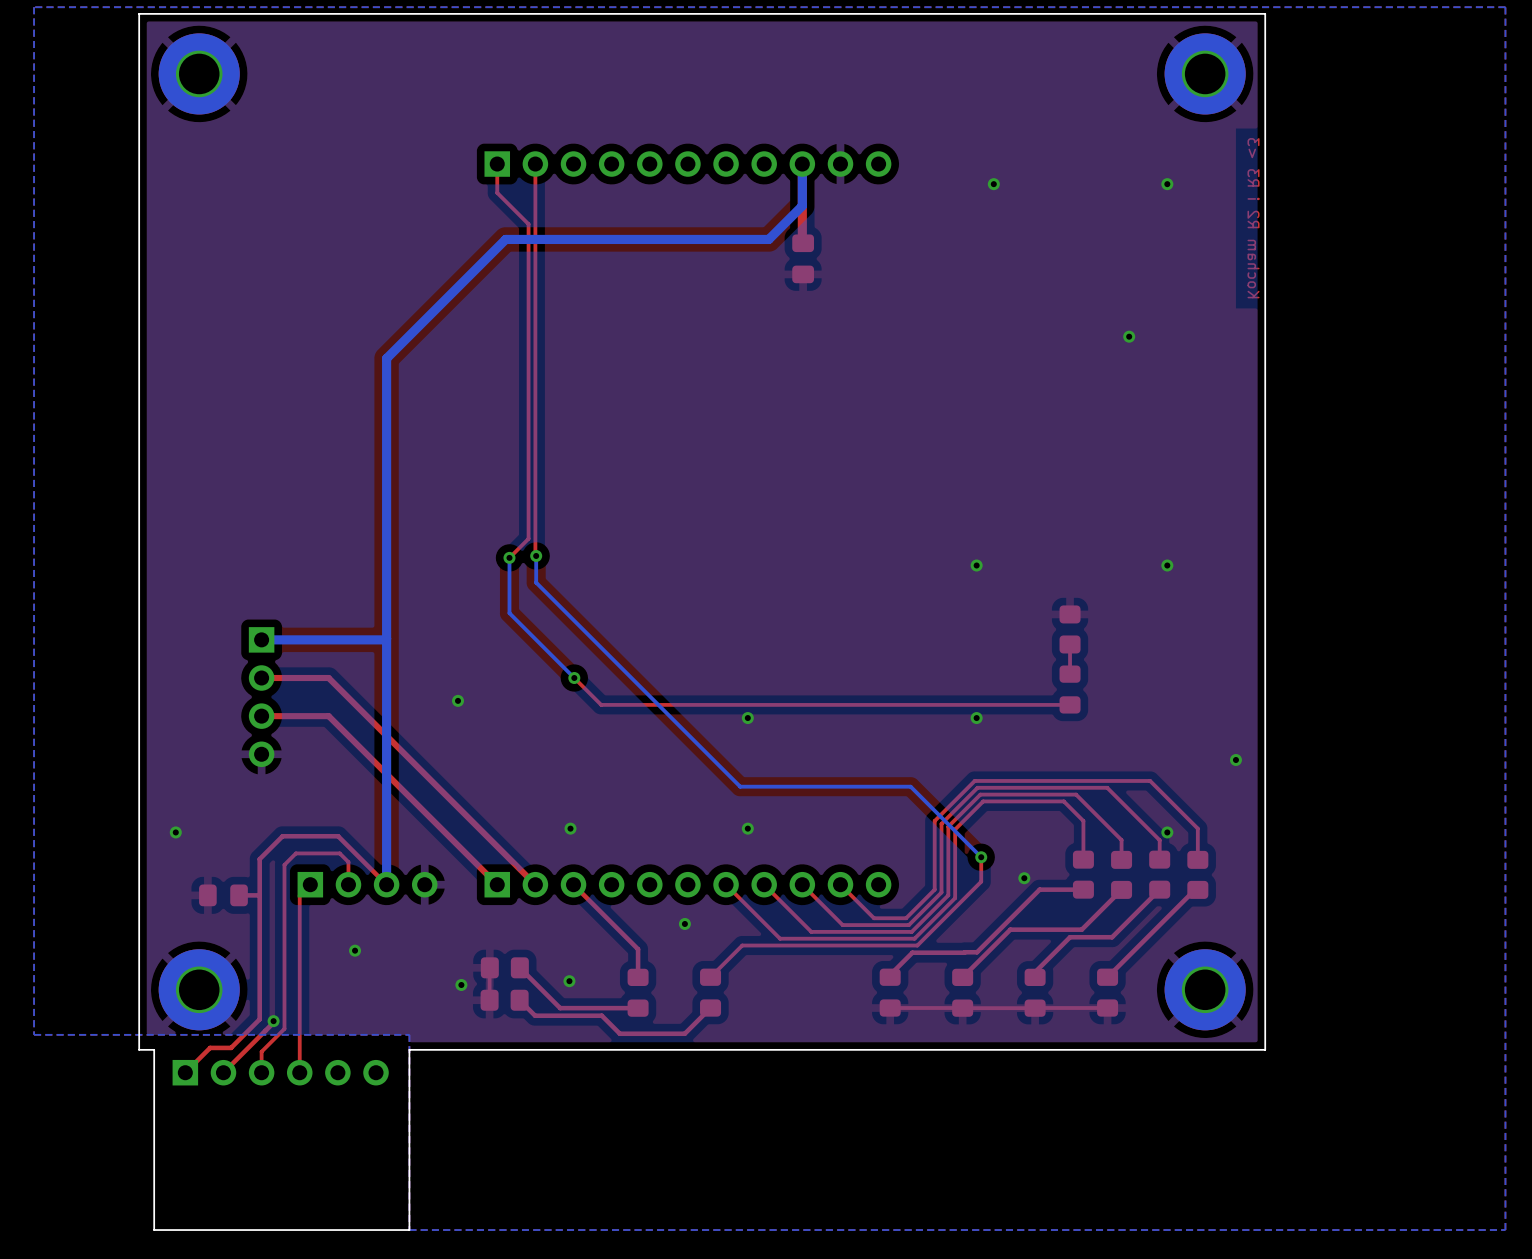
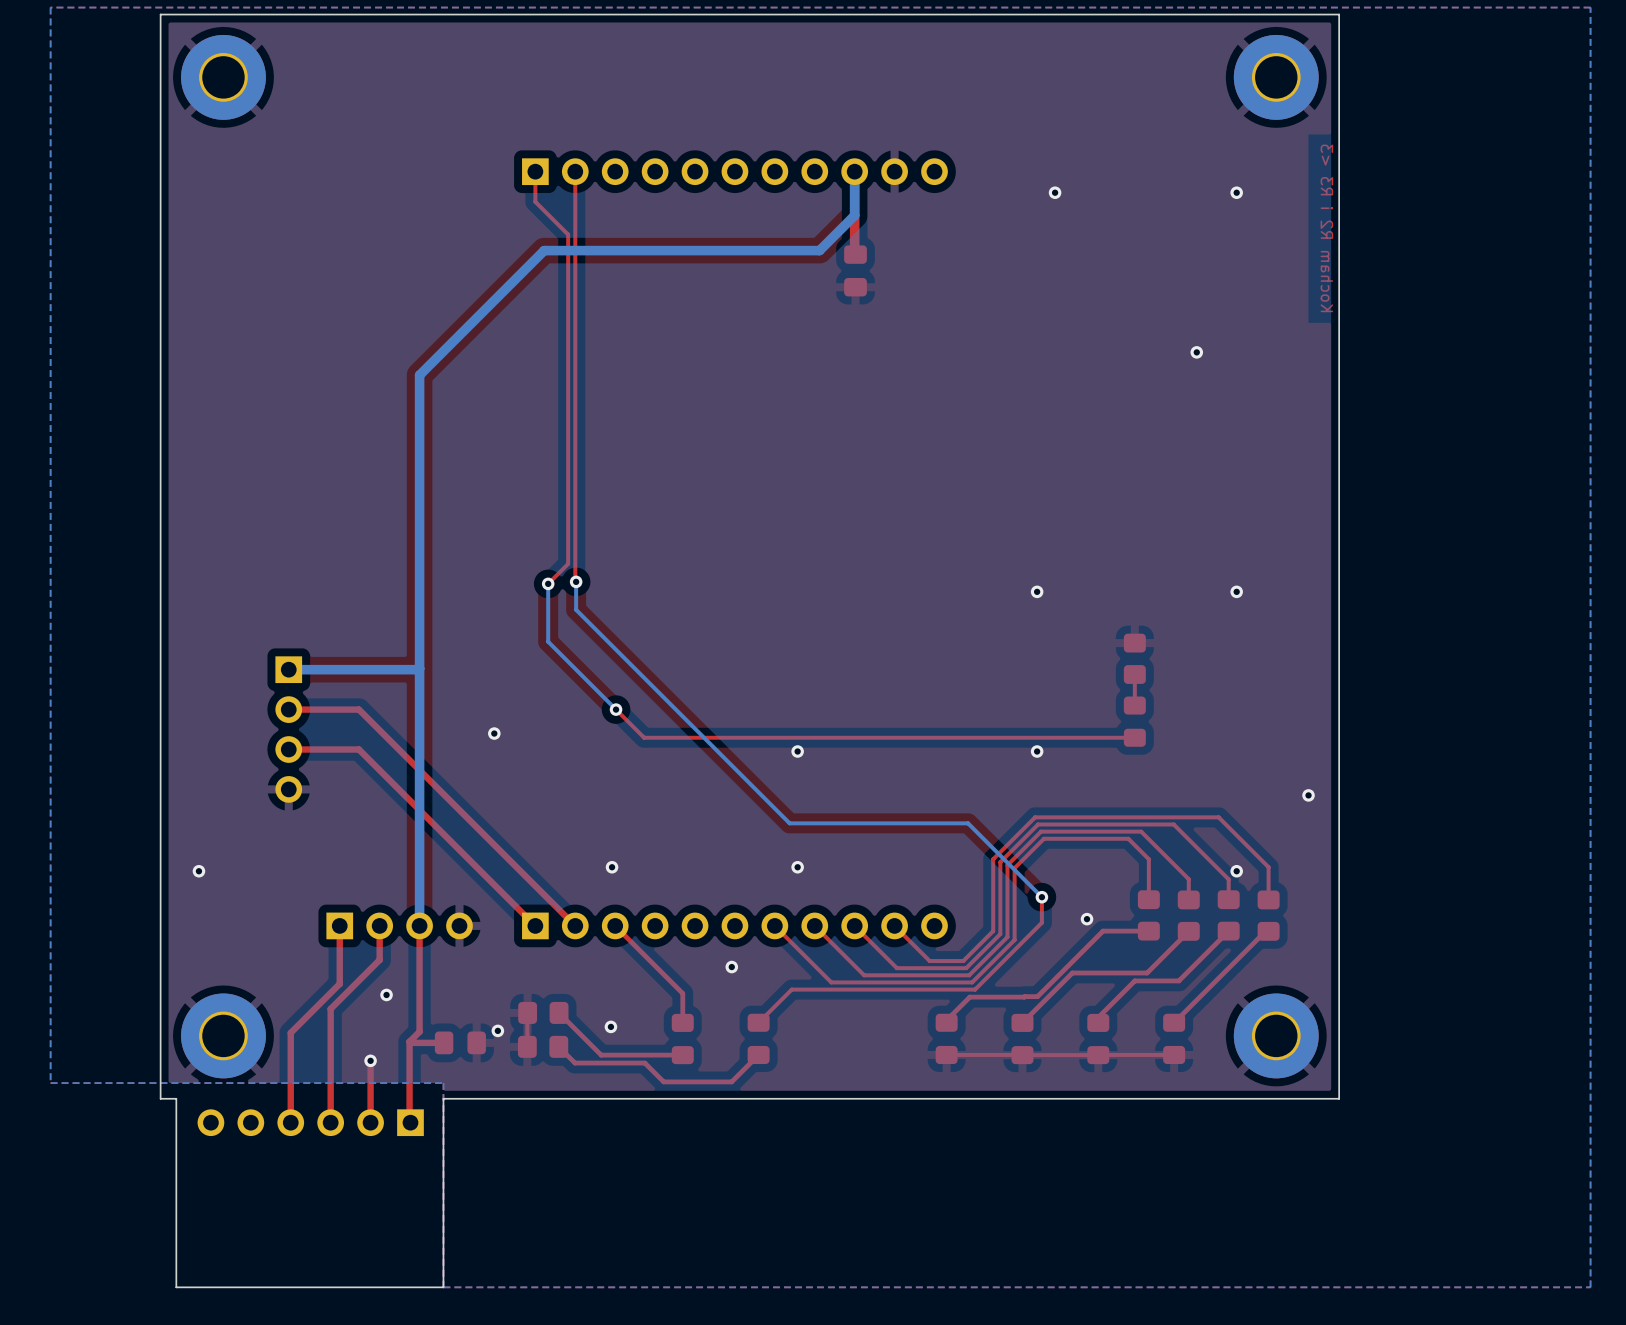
top track: (310, 884) (299, 895) (299, 1072) -> (339, 925) (339, 983) (290, 1032) (290, 1122)
top track: (348, 884) (348, 862) (339, 853) (295, 853) (284, 864) (284, 1028) (261, 1051) (261, 1072) -> (379, 925) (379, 959) (330, 1008) (330, 1122)
top track: (386, 884) (338, 836) (282, 836) (259, 859) (259, 1019) (231, 1047) (210, 1047) (185, 1072) -> (419, 925) (419, 1031) (409, 1041)
part position: (223, 895) -> (460, 1042)
top track: (259, 895) (239, 895) -> none
top track: none -> (409, 1041) (409, 1122)
top track: none -> (409, 1041) (444, 1042)
top track: none -> (370, 1060) (370, 1122)
top track: (273, 1021) (223, 1072) -> none
via position: (273, 1021) -> (370, 1060)
part rotation: 0° (280, 1072) -> 180° (310, 1122)

